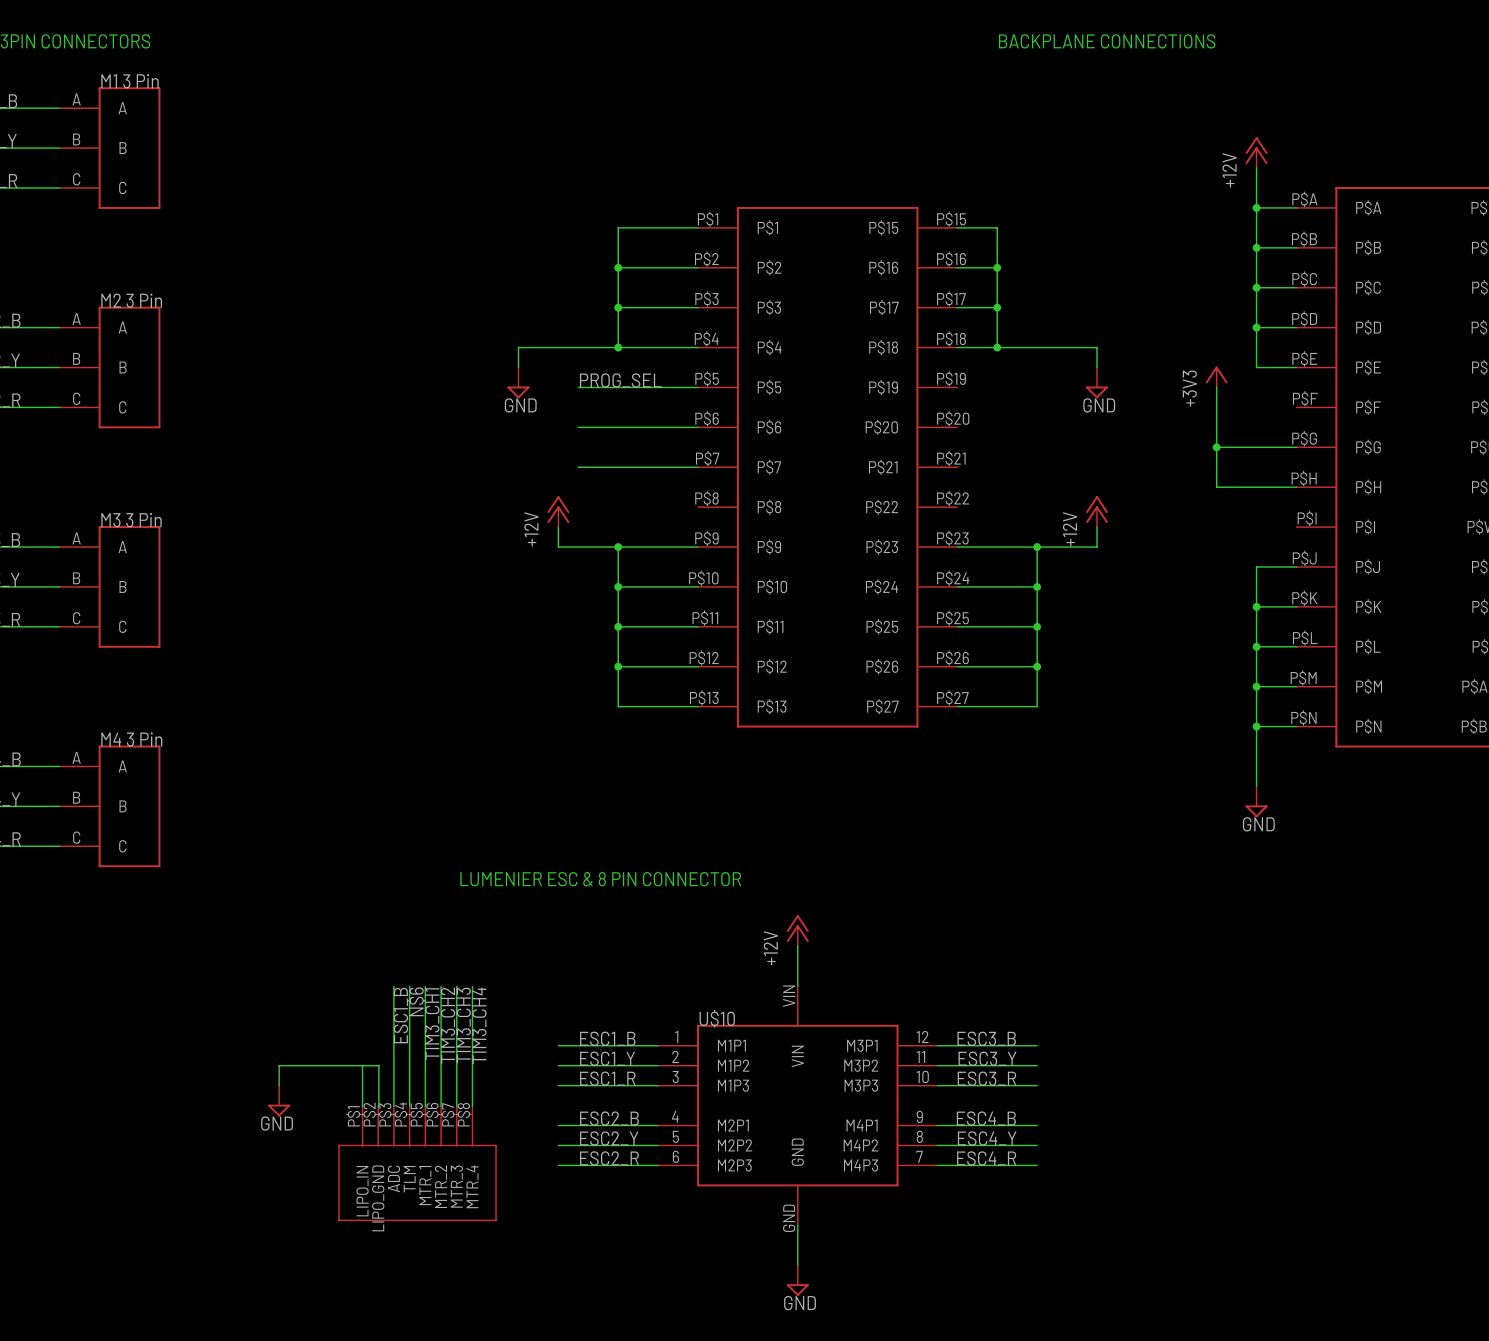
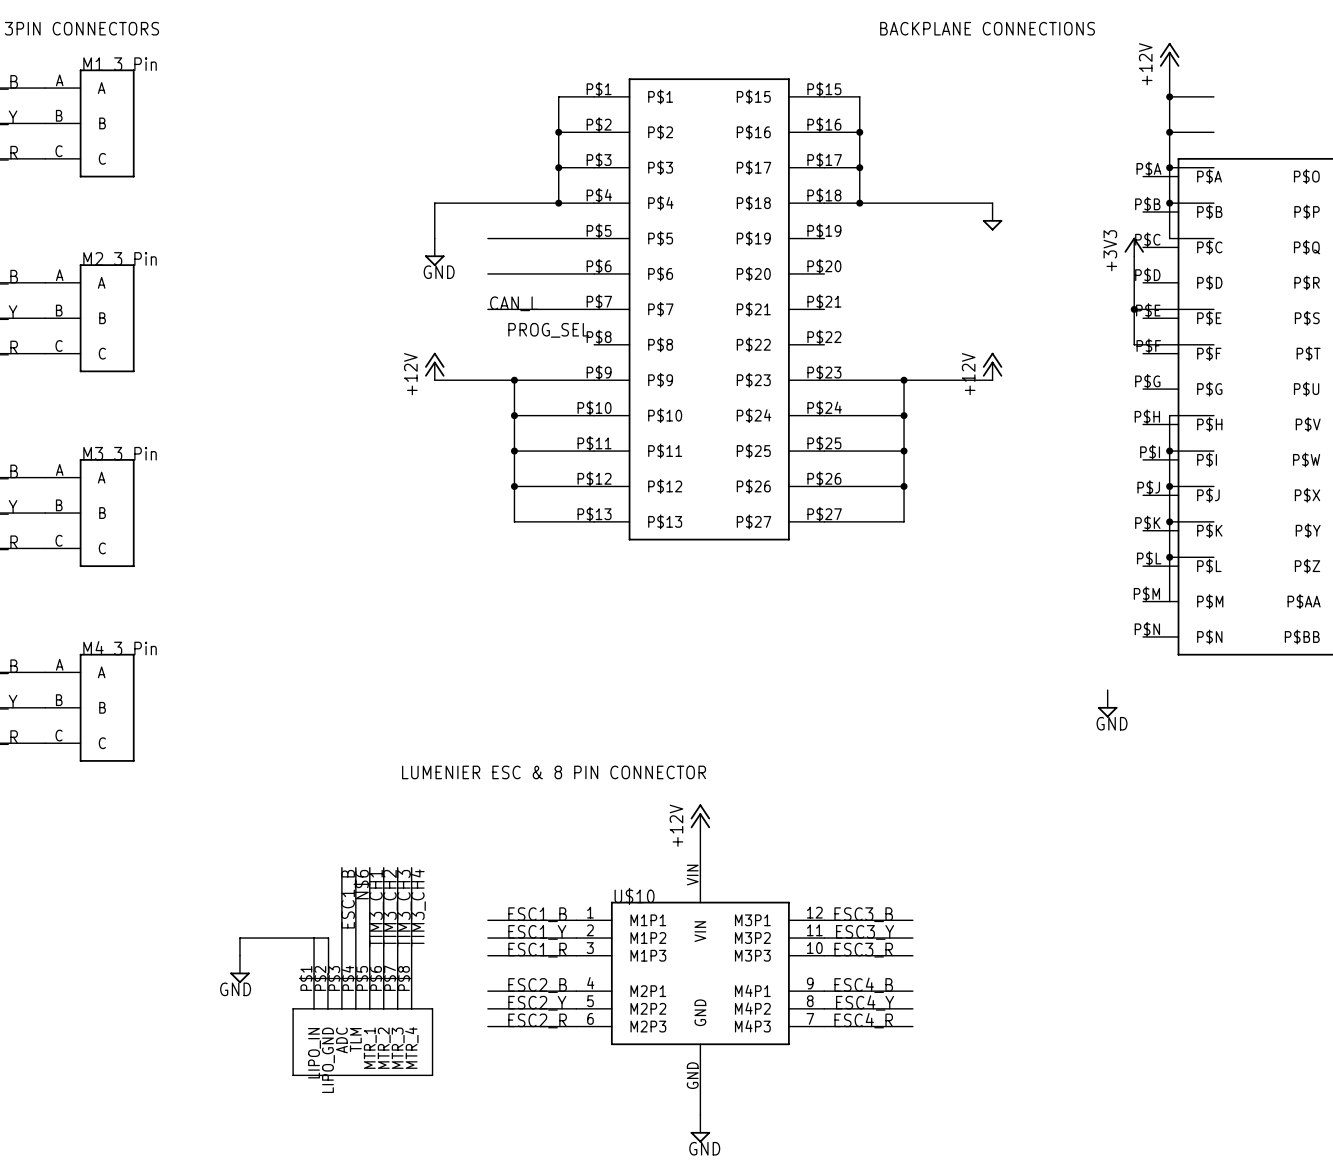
wire: none -> (1169, 70) (1169, 238) (1213, 238)
wire: none -> (594, 96) (558, 96) (558, 203)
wire: none -> (1169, 96) (1213, 96)
junction: none -> (1169, 96)
power symbol position: +12V (1256, 152) -> +12V (1169, 56)
wire: none -> (558, 132) (594, 132)
junction: none -> (558, 132)
junction: none -> (859, 132)
wire: none -> (1169, 132) (1213, 132)
junction: none -> (1169, 132)
wire: (1256, 168) (1256, 367) (1296, 367) -> none
wire: none -> (558, 167) (594, 167)
junction: none -> (558, 167)
junction: none -> (859, 167)
wire: none -> (1169, 167) (1213, 167)
junction: none -> (1169, 167)
wire: (1256, 207) (1296, 207) -> none
junction: (1256, 207) -> none
wire: (698, 227) (618, 227) (618, 347) -> none
wire: (957, 227) (997, 227) (997, 347) -> (824, 96) (859, 96) (859, 203)
wire: none -> (594, 203) (434, 203) (434, 238)
wire: none -> (824, 203) (992, 203)
wire: none -> (1169, 203) (1213, 203)
junction: none -> (1169, 203)
wire: (1256, 247) (1296, 247) -> none
junction: (1256, 247) -> none
power symbol: none -> (992, 216)
wire: (618, 267) (698, 267) -> none
junction position: (618, 267) -> (558, 203)
wire: (957, 267) (997, 267) -> (824, 132) (859, 132)
junction position: (997, 267) -> (859, 203)
wire: (1256, 287) (1296, 287) -> none
junction: (1256, 287) -> none
wire: none -> (1134, 256) (1134, 344) (1213, 344)
wire: (618, 307) (698, 307) -> none
junction: (618, 307) -> none
wire: (957, 307) (997, 307) -> (824, 167) (859, 167)
junction: (997, 307) -> none
wire: (1256, 327) (1296, 327) -> none
junction: (1256, 327) -> none
junction: (618, 347) -> none
wire: (698, 347) (518, 347) (518, 367) -> none
wire: (957, 347) (1096, 347) (1096, 367) -> none
junction: (997, 347) -> none
label: none -> CAN_L (514, 303)
wire: none -> (1134, 309) (1213, 309)
junction: none -> (1134, 309)
power symbol position: +3V3 (1216, 376) -> +3V3 (1134, 246)
power symbol position: GND (518, 382) -> GND (434, 252)
power symbol: GND (1096, 382) -> none
wire: (578, 387) (698, 387) -> (487, 238) (594, 238)
wire: (1216, 387) (1216, 487) (1296, 487) -> none
wire: (578, 427) (698, 427) -> (487, 273) (594, 273)
wire: none -> (434, 380) (594, 380)
wire: none -> (514, 380) (514, 521) (594, 521)
junction: none -> (514, 380)
wire: none -> (824, 380) (992, 380)
wire: none -> (904, 380) (904, 521) (824, 521)
junction: none -> (904, 380)
wire: (1216, 447) (1296, 447) -> none
junction: (1216, 447) -> none
wire: (578, 467) (698, 467) -> (487, 309) (594, 309)
part position: (827, 467) -> (709, 309)
wire: none -> (514, 415) (594, 415)
junction: none -> (514, 415)
wire: none -> (824, 415) (904, 415)
junction: none -> (904, 415)
wire: none -> (1213, 415) (1169, 415) (1169, 601)
power symbol position: +12V (558, 511) -> +12V (434, 366)
power symbol position: +12V (1096, 511) -> +12V (992, 366)
wire: none -> (514, 451) (594, 451)
junction: none -> (514, 451)
wire: none -> (824, 451) (904, 451)
junction: none -> (904, 451)
wire: none -> (1169, 451) (1213, 451)
junction: none -> (1169, 451)
wire: (558, 527) (558, 547) (698, 547) -> none
wire: (1096, 527) (1096, 547) (957, 547) -> none
wire: (618, 547) (618, 706) (698, 706) -> none
junction: (618, 547) -> none
wire: (1037, 547) (1037, 706) (957, 706) -> none
junction position: (1037, 547) -> (904, 486)
wire: none -> (514, 486) (594, 486)
junction: none -> (514, 486)
wire: none -> (824, 486) (904, 486)
wire: none -> (1169, 486) (1213, 486)
junction: none -> (1169, 486)
wire: (1296, 567) (1256, 567) (1256, 786) -> none
wire: (618, 586) (698, 586) -> none
junction: (618, 586) -> none
wire: (957, 586) (1037, 586) -> none
junction: (1037, 586) -> none
wire: none -> (1169, 521) (1213, 521)
junction: none -> (1169, 521)
wire: (1256, 606) (1296, 606) -> none
junction: (1256, 606) -> none
wire: (618, 626) (698, 626) -> none
junction: (618, 626) -> none
wire: (957, 626) (1037, 626) -> none
junction: (1037, 626) -> none
wire: none -> (1169, 557) (1213, 557)
junction: none -> (1169, 557)
wire: (1256, 646) (1296, 646) -> none
junction: (1256, 646) -> none
wire: (618, 666) (698, 666) -> none
junction: (618, 666) -> none
wire: (957, 666) (1037, 666) -> none
junction: (1037, 666) -> none
wire: (1256, 686) (1296, 686) -> none
junction: (1256, 686) -> none
wire: (1256, 726) (1296, 726) -> none
junction: (1256, 726) -> none

